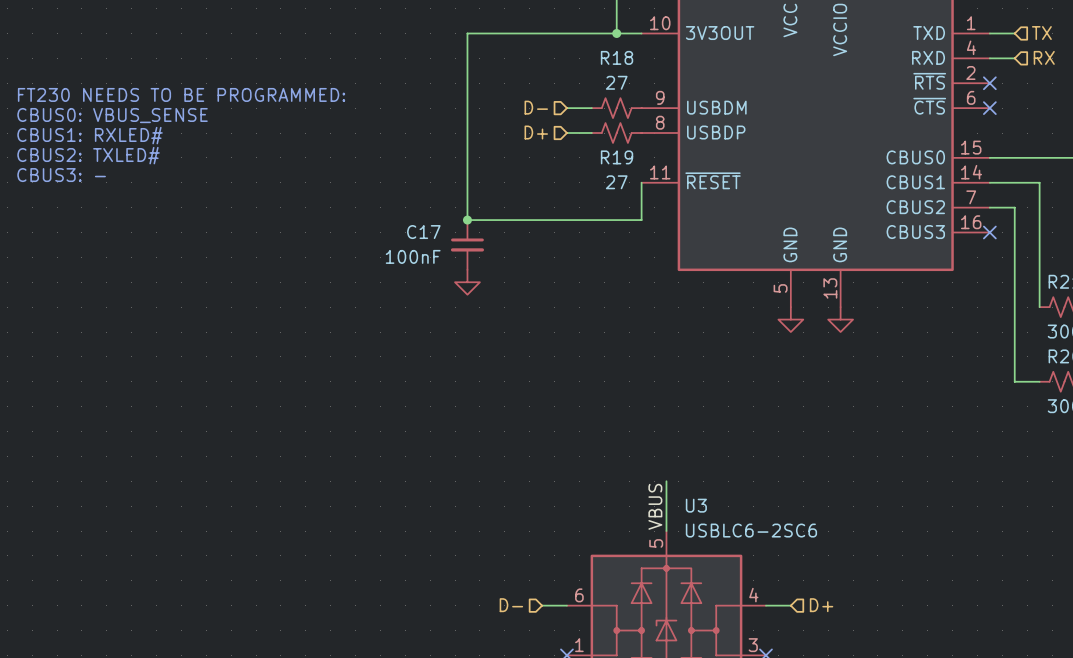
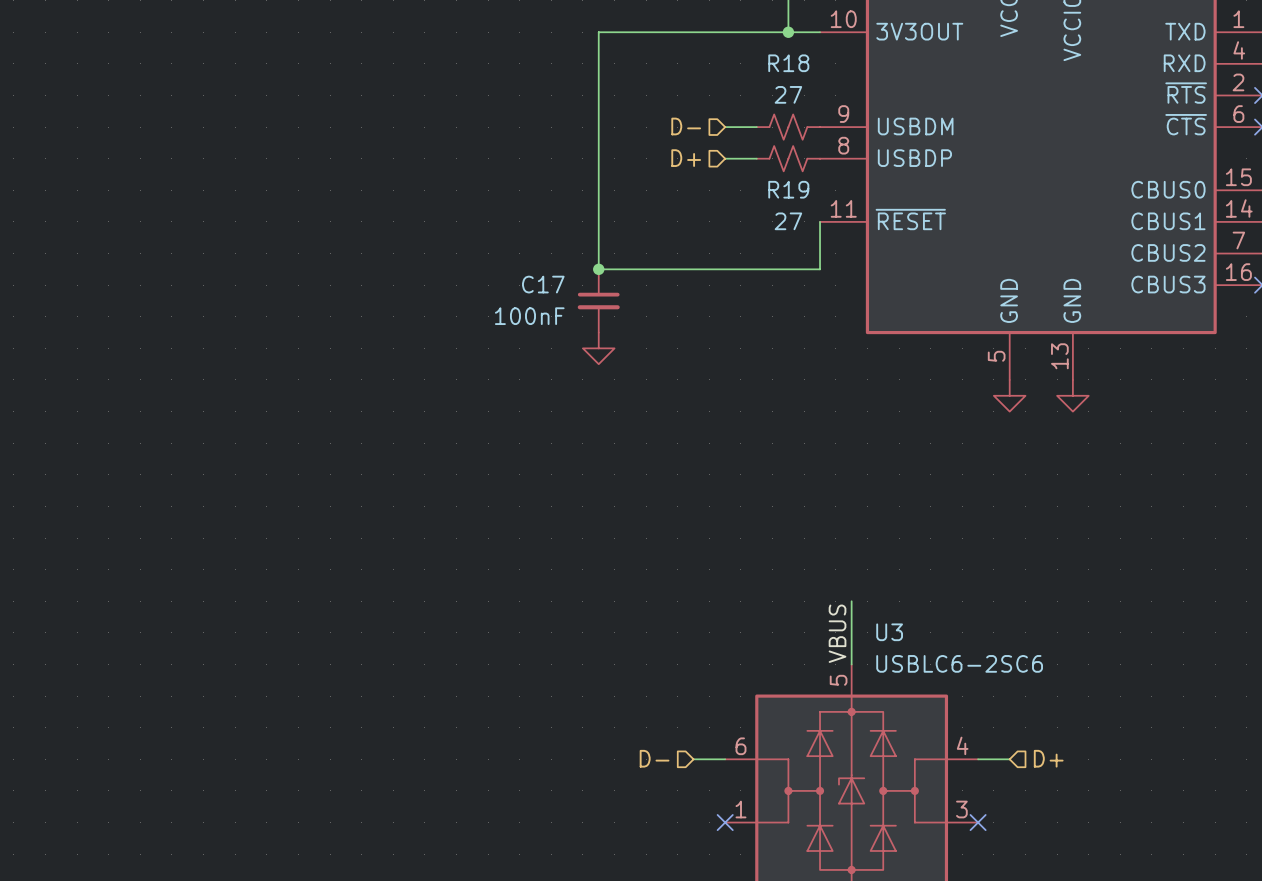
text: FT230 NEEDS TO BE PROGRAMMED: (181, 94) -> none
text: CBUS0: VBUS_SENSE (112, 115) -> none
text: CBUS1: RXLED# (90, 135) -> none
text: CBUS2: TXLED# (88, 155) -> none
text: CBUS3: - (61, 175) -> none

